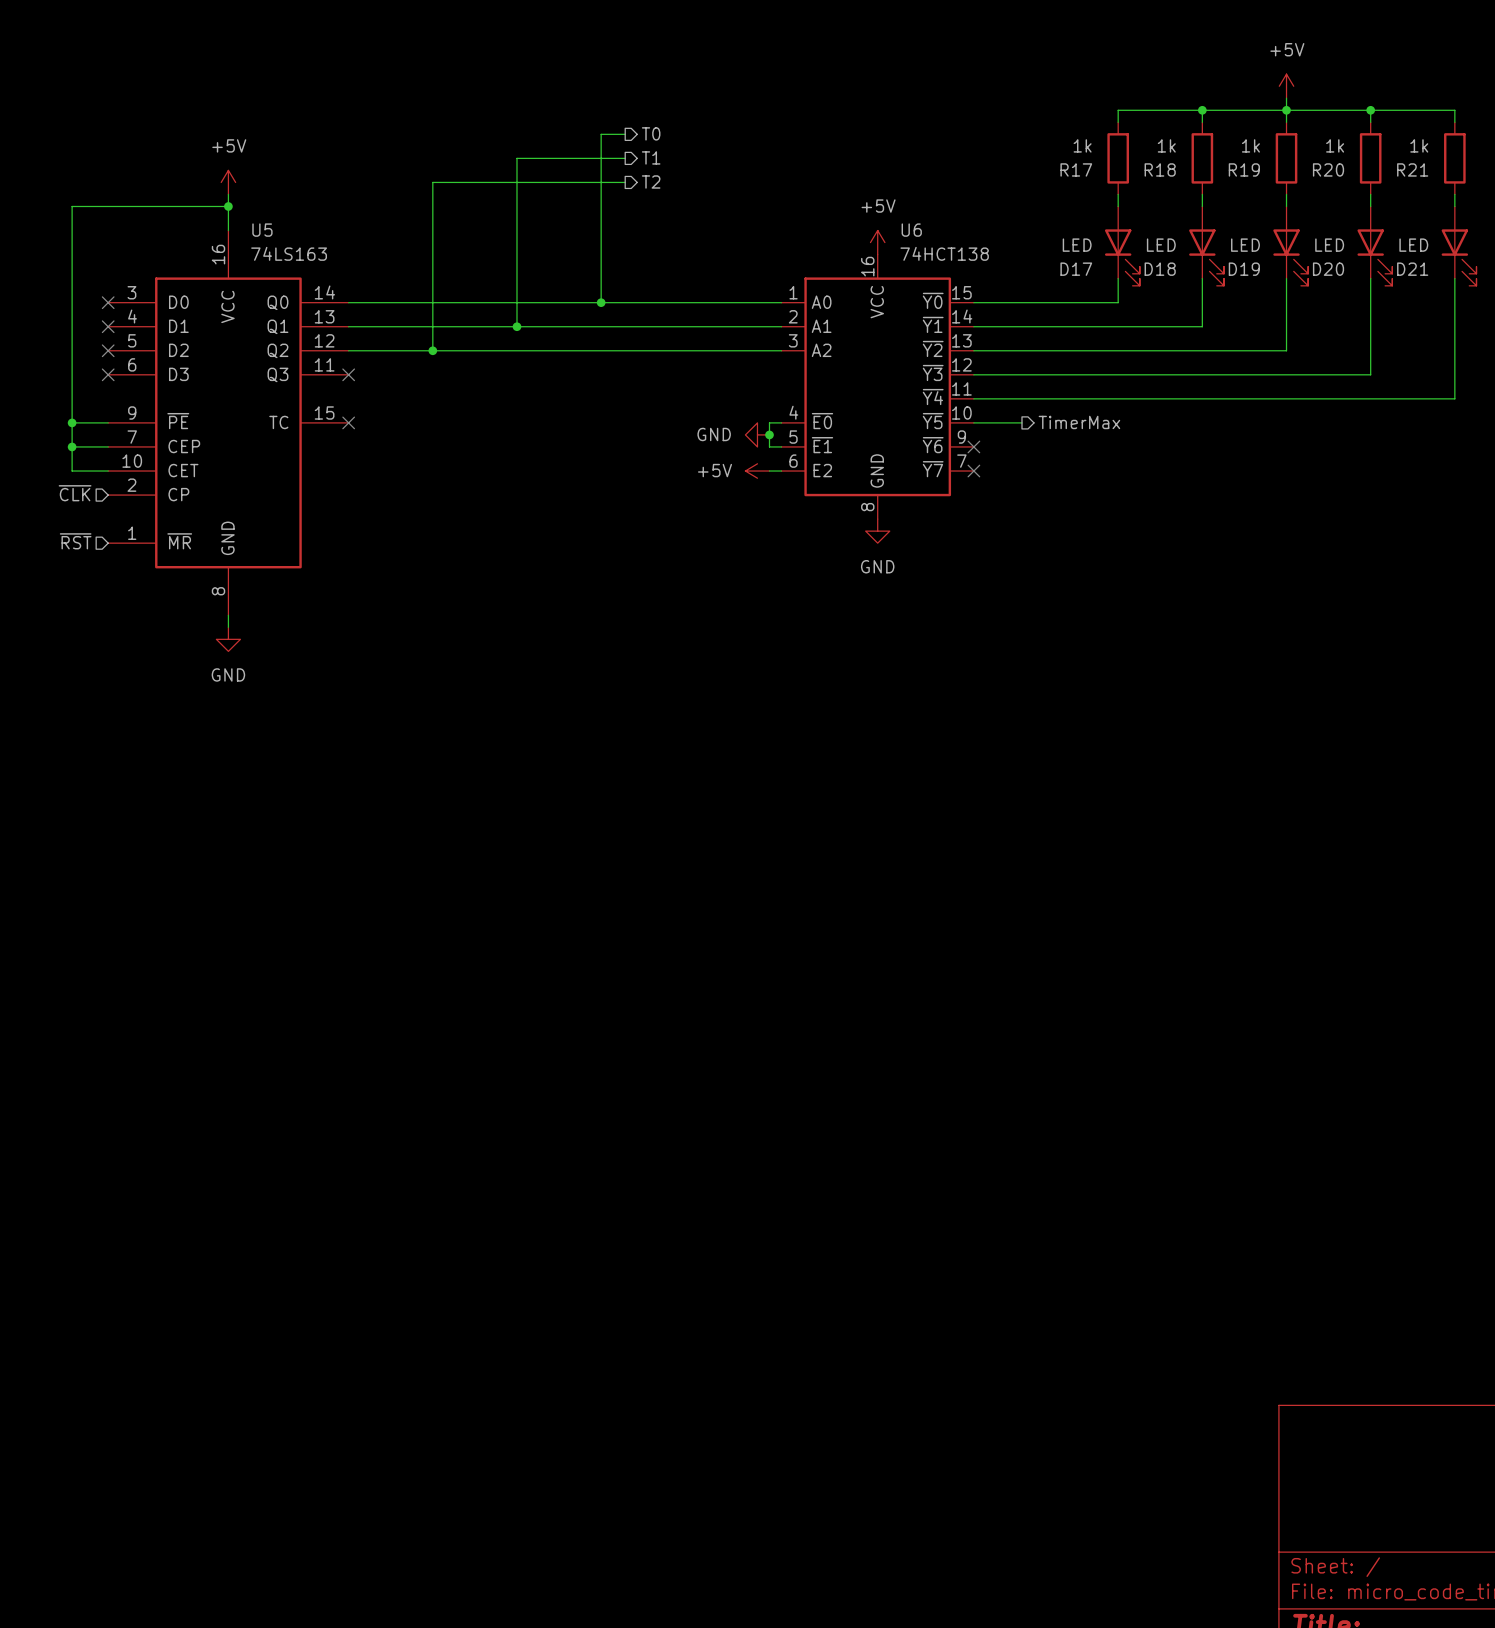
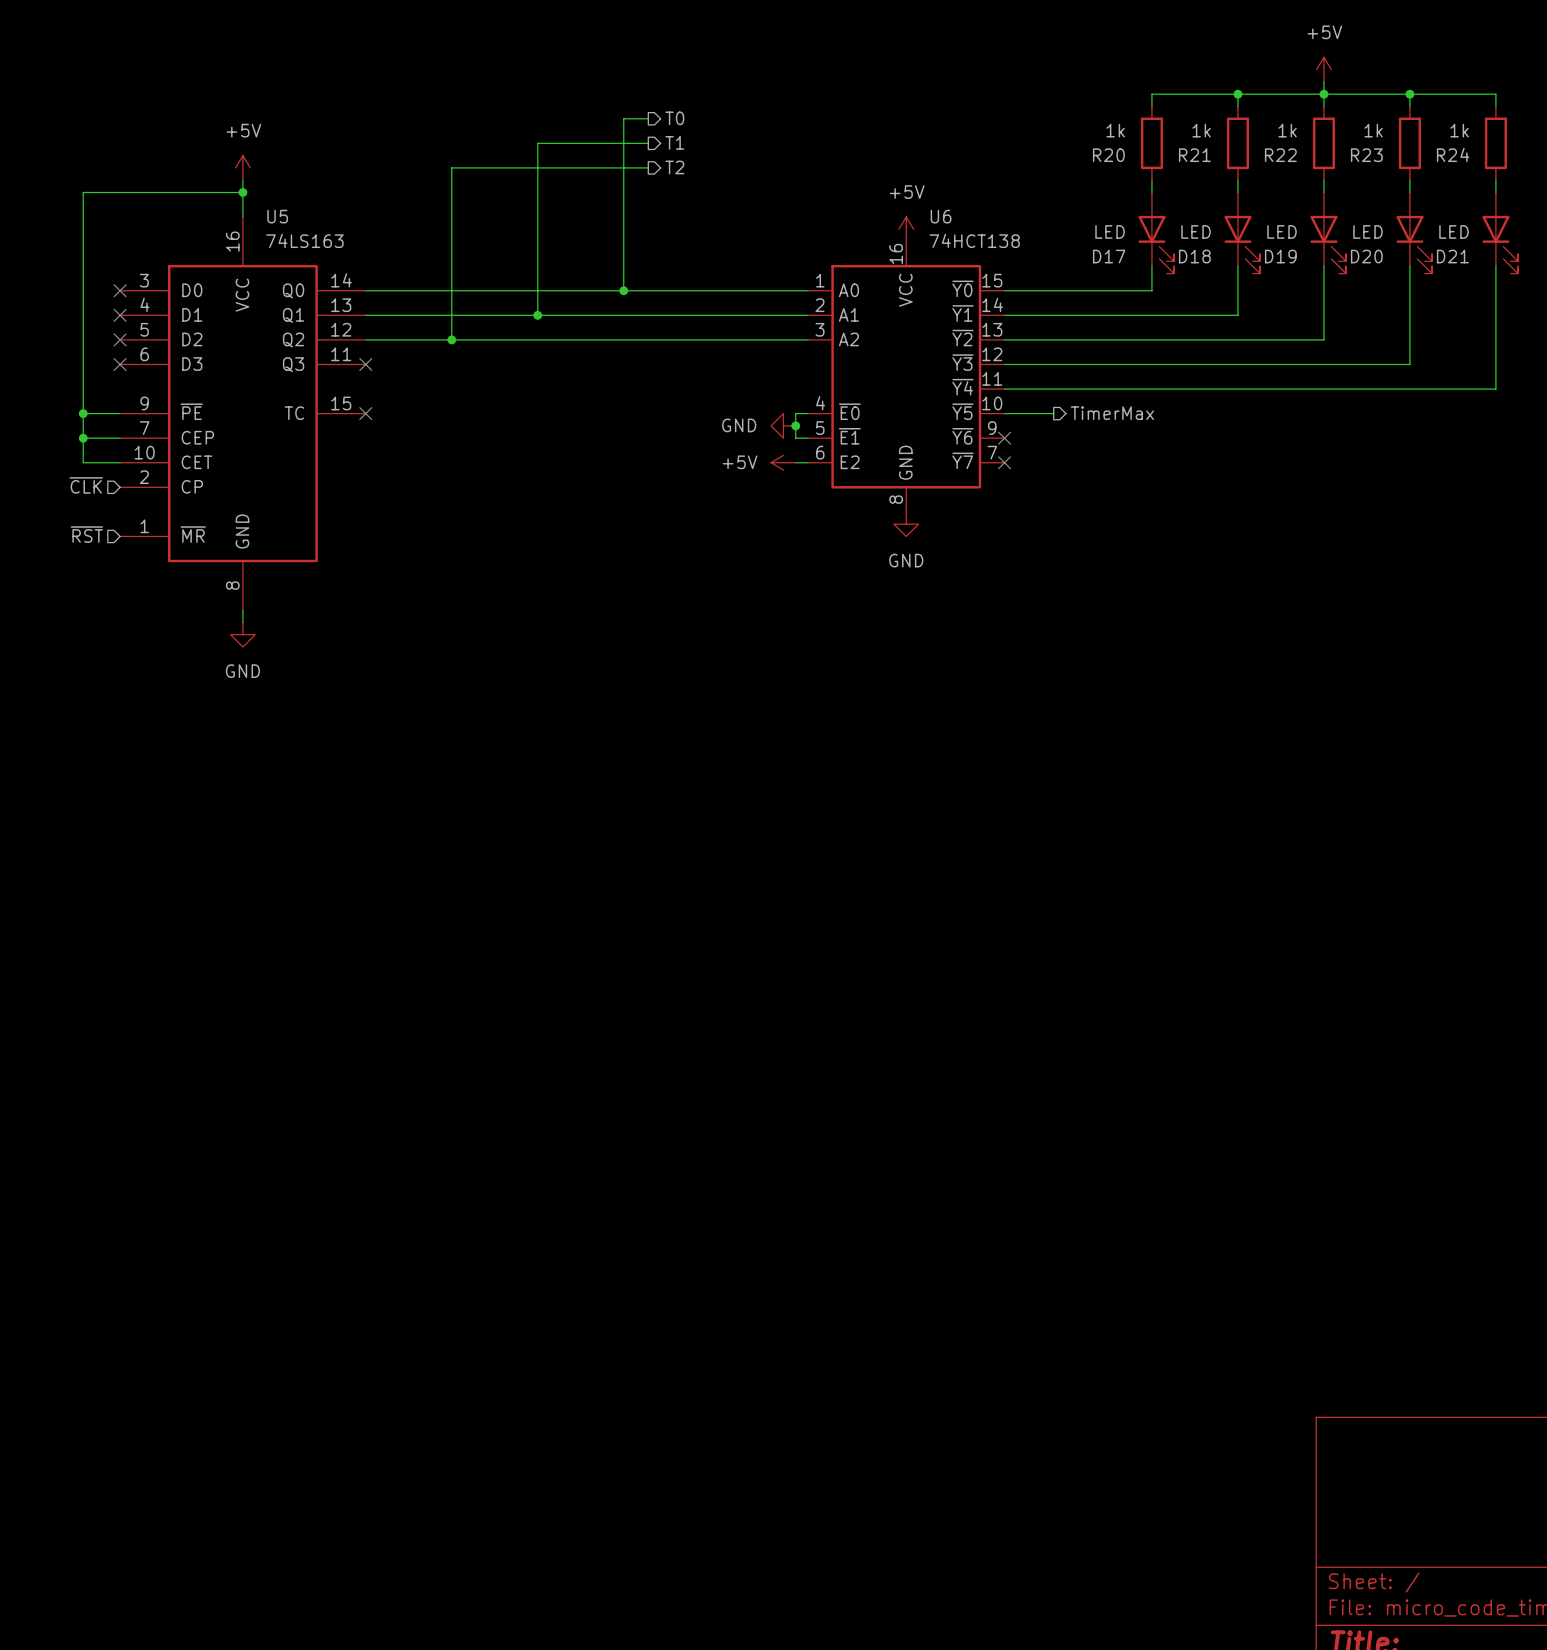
R17 name: R17 (1076, 169) -> R20 (1108, 155)
R18 name: R18 (1160, 169) -> R21 (1194, 155)
R19 name: R19 (1244, 169) -> R22 (1280, 155)
R20 name: R20 (1328, 169) -> R23 (1366, 155)
R21 name: R21 (1412, 169) -> R24 (1453, 154)

